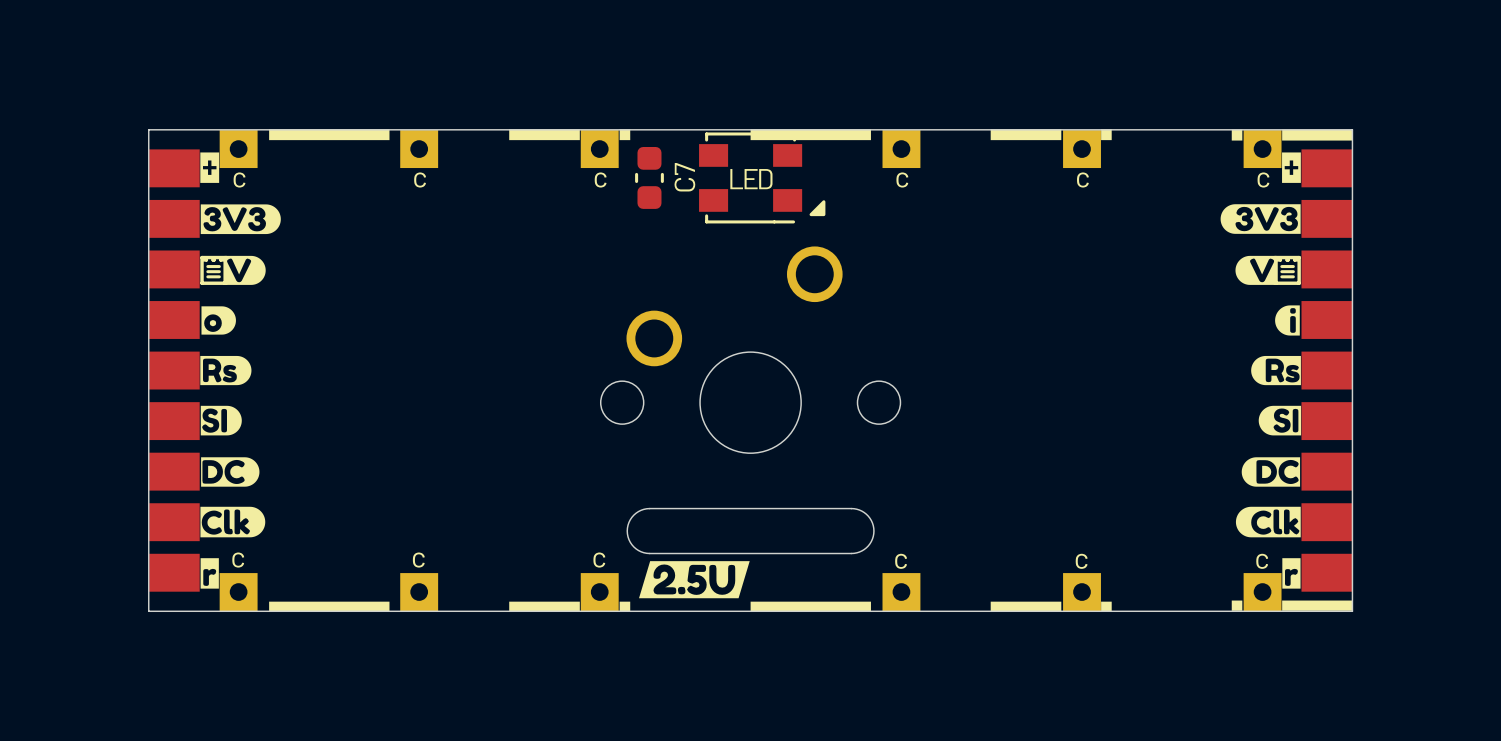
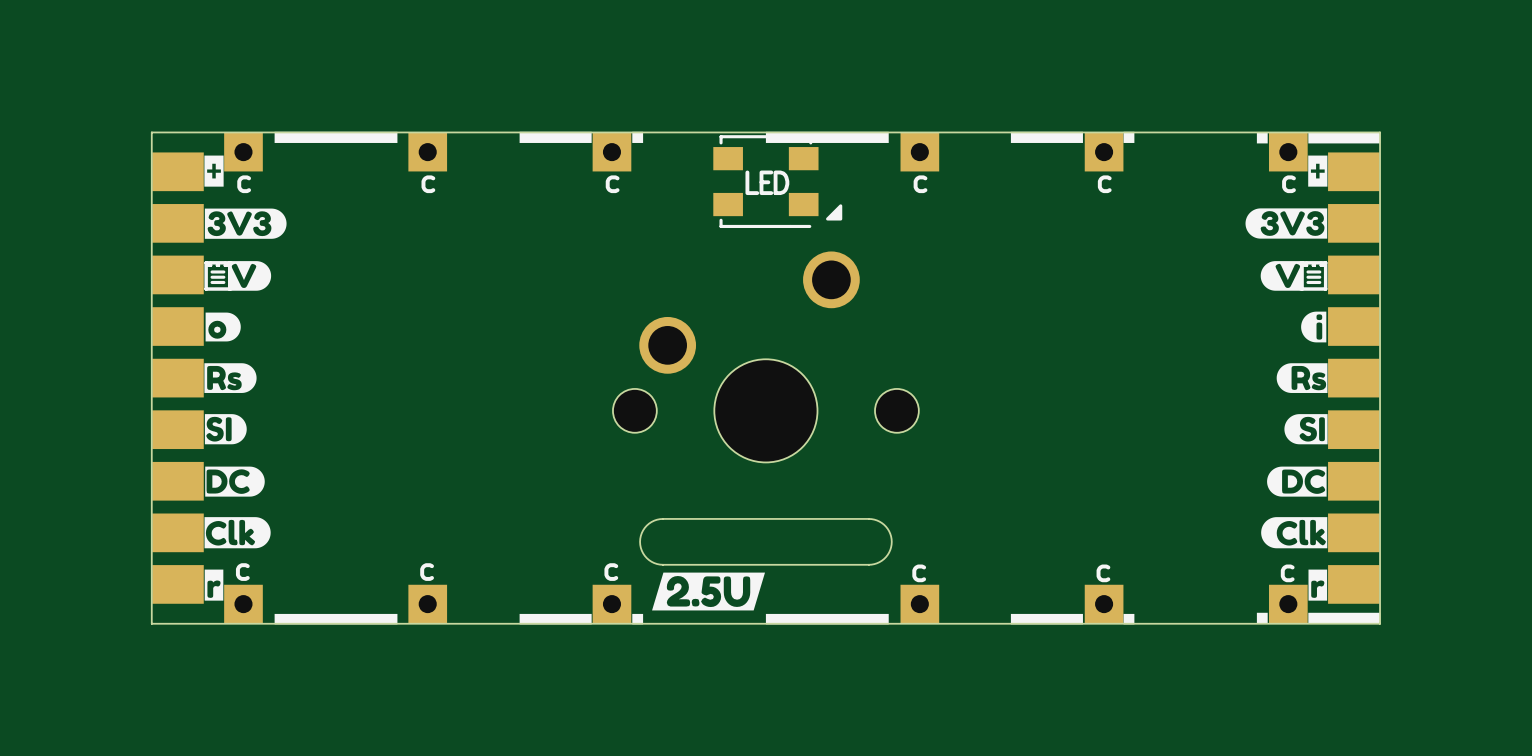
C7: (649, 177) -> none

